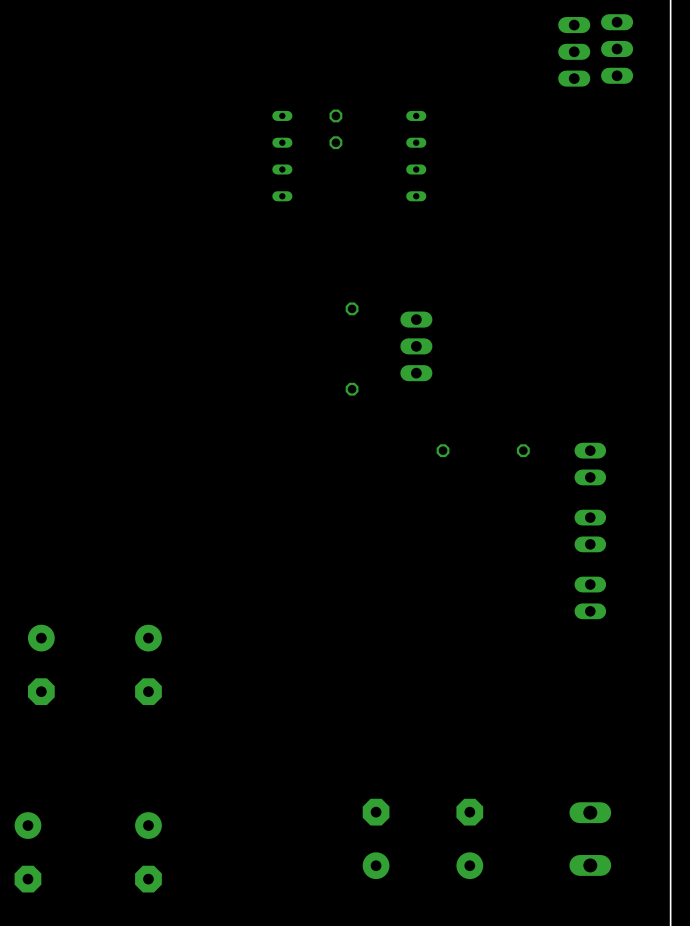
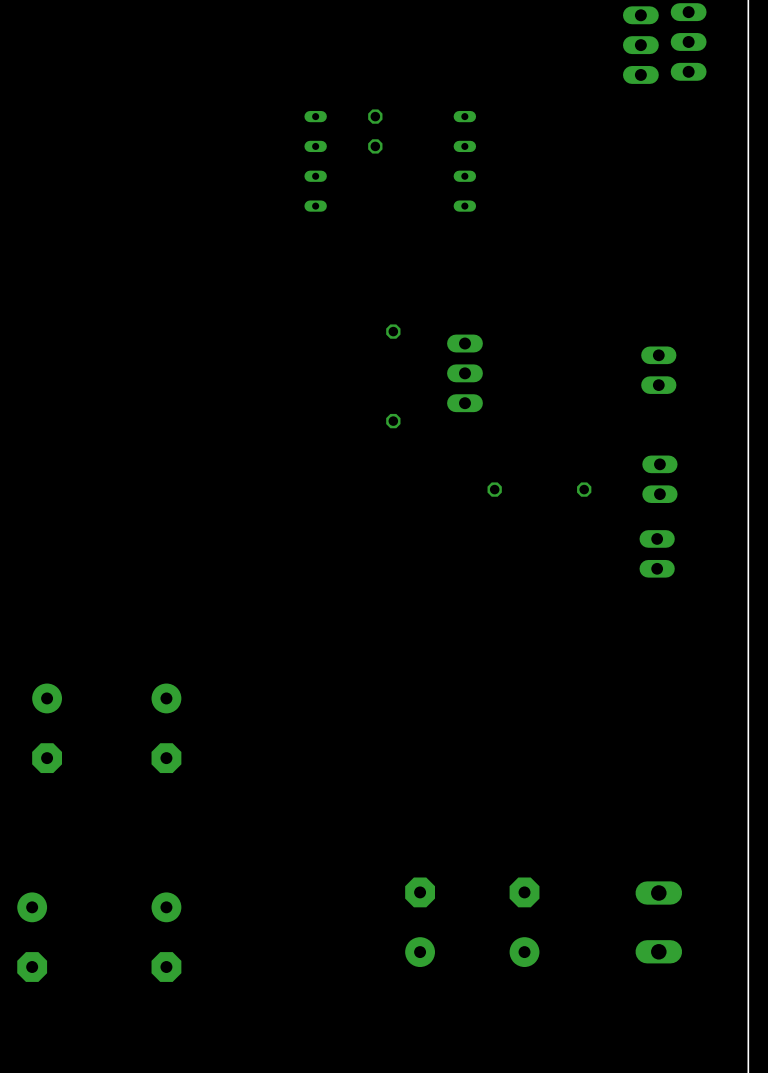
part: none -> (658, 370)
part: none -> (659, 479)
part: (590, 464) -> none
part: none -> (657, 553)
part: (590, 530) -> none
part: (590, 597) -> none

